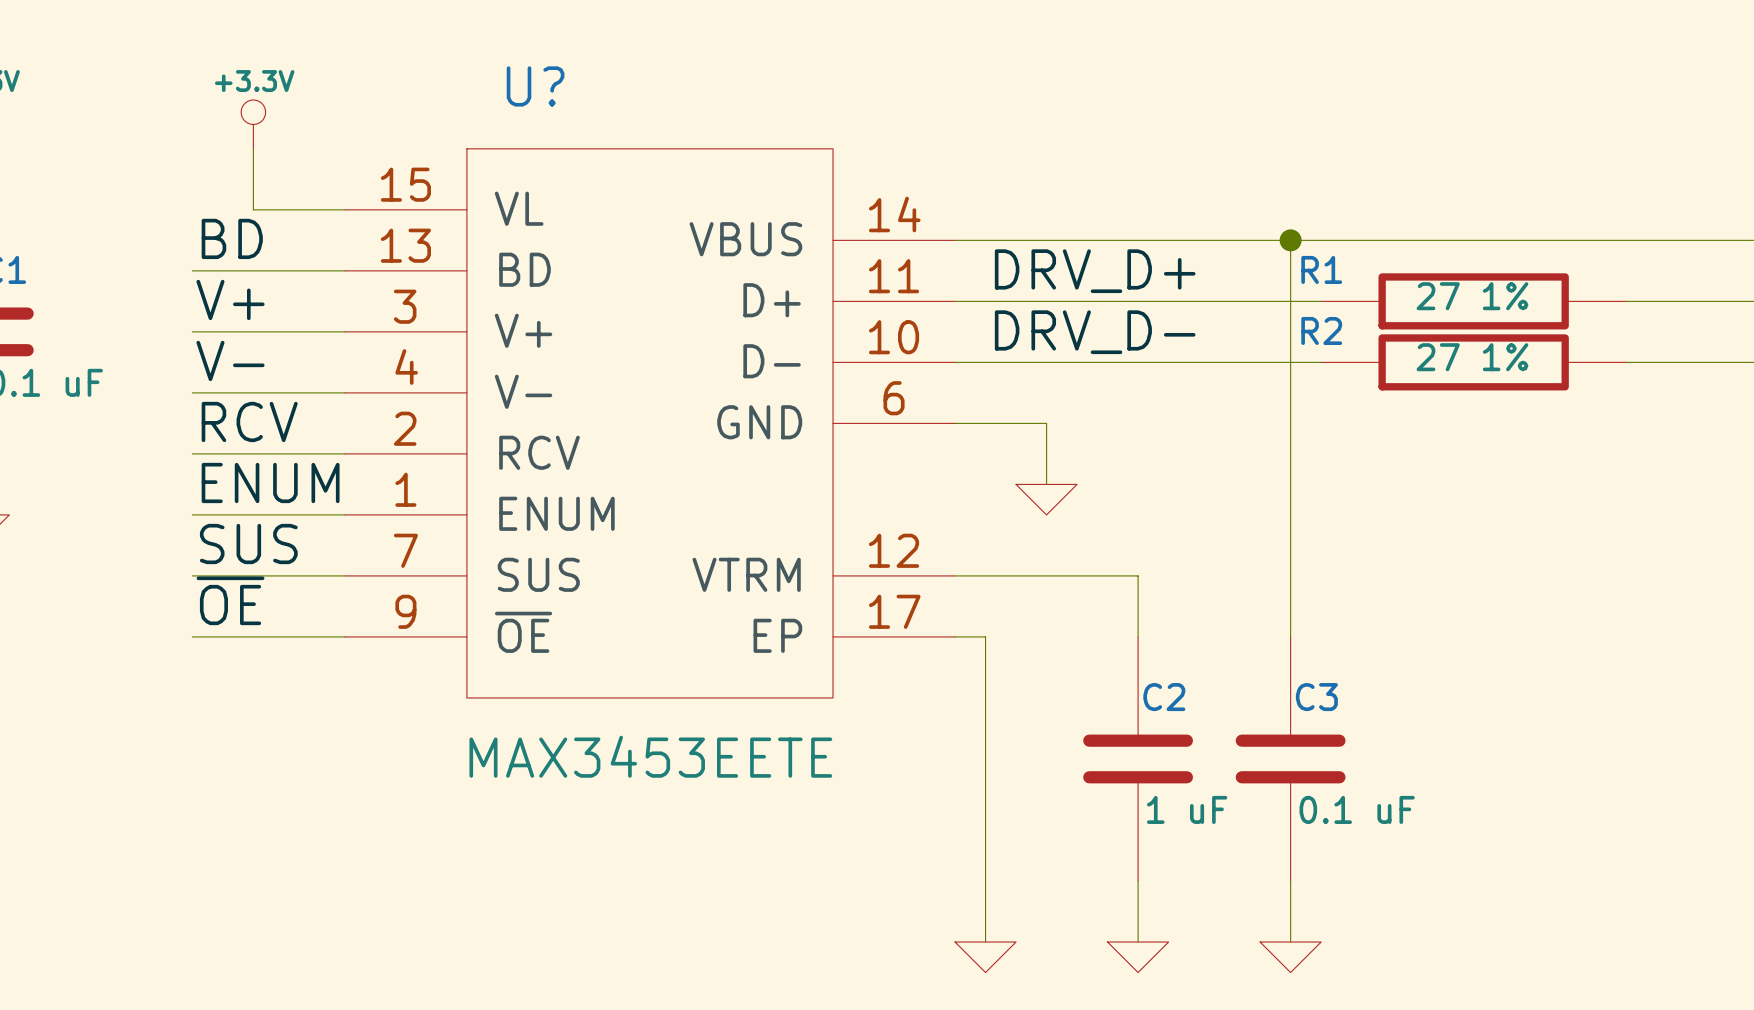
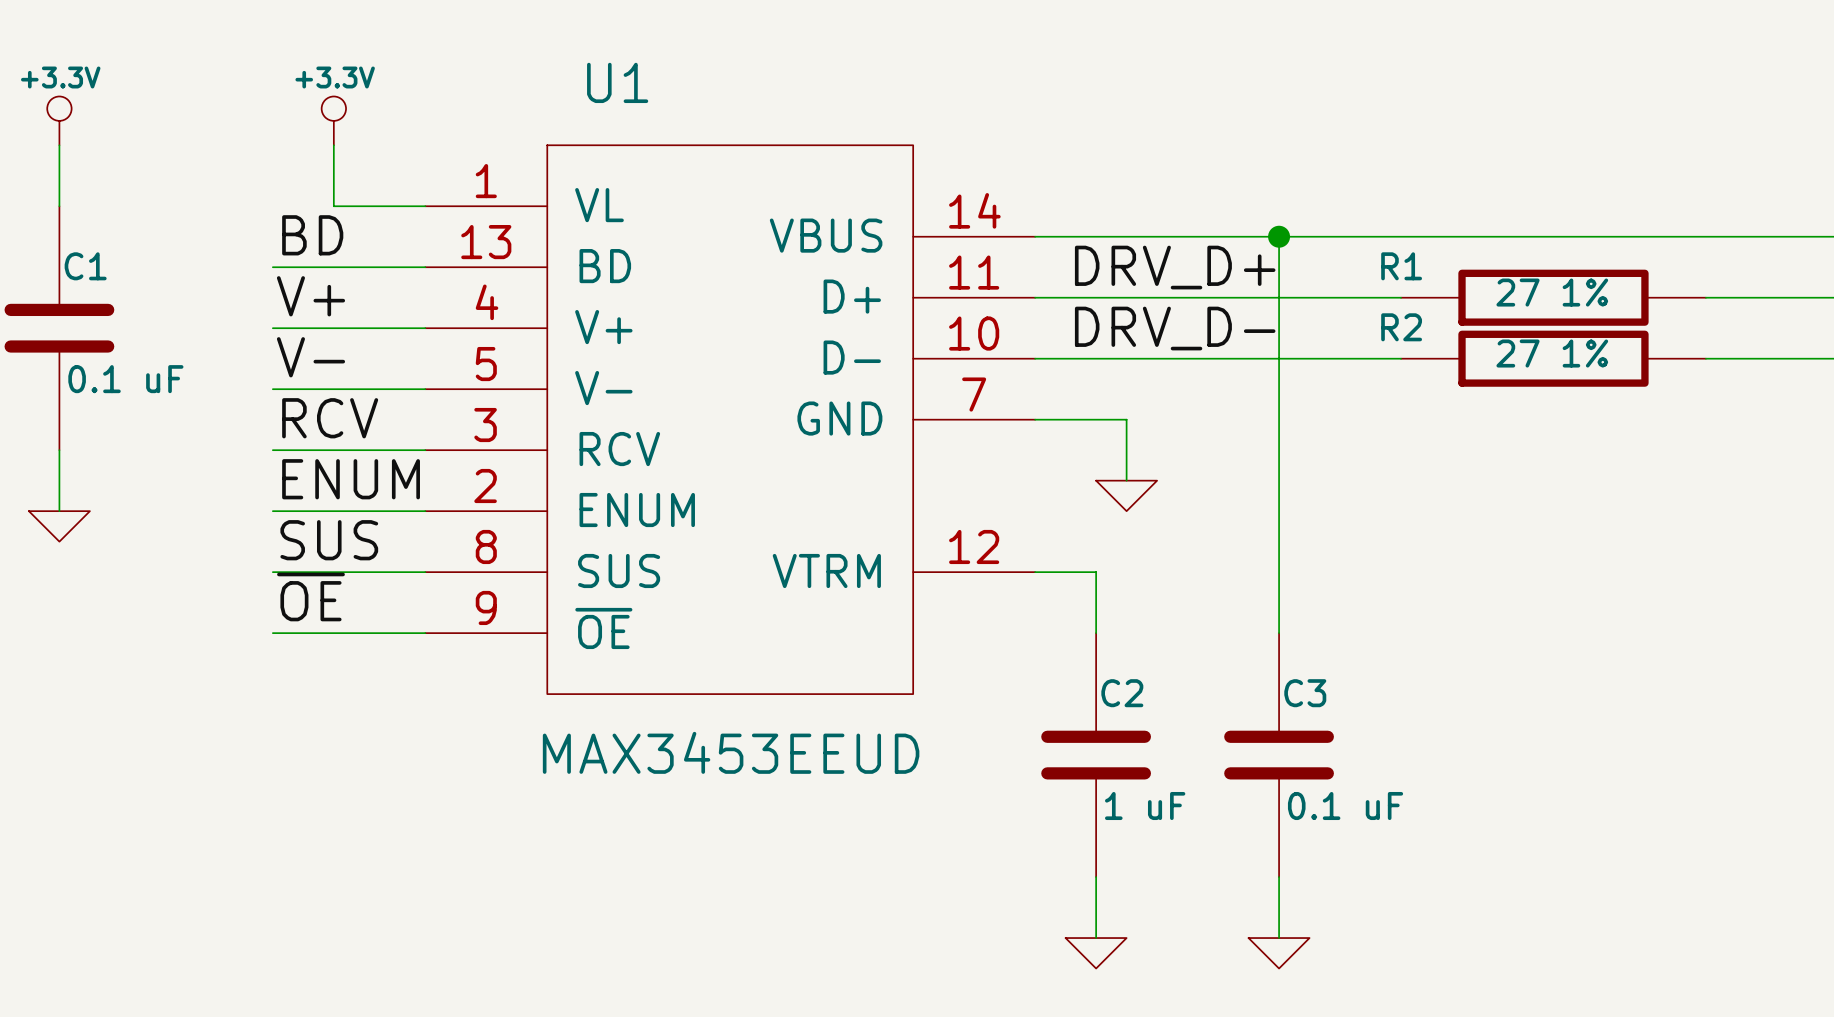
wire: (1290, 240) (1290, 636) -> (1279, 236) (1279, 633)
junction position: (1290, 240) -> (1279, 236)
U?: MAX3453EETE (649, 423) -> none
U1: none -> MAX3453EEUD (730, 419)
wire: (1016, 575) (1138, 575) (1138, 636) -> (1096, 572) (1096, 633)
wire: (955, 636) (985, 636) (985, 942) -> none
C2 position: (1138, 758) -> (1096, 755)
C3 position: (1290, 758) -> (1279, 755)
wire: (1138, 881) (1138, 942) -> (1096, 877) (1096, 938)
wire: (1290, 881) (1290, 942) -> (1279, 877) (1279, 938)
power symbol position: (985, 957) -> (1096, 953)
power symbol: (1138, 957) -> none
power symbol: none -> (1279, 953)
power symbol: (1290, 957) -> none

